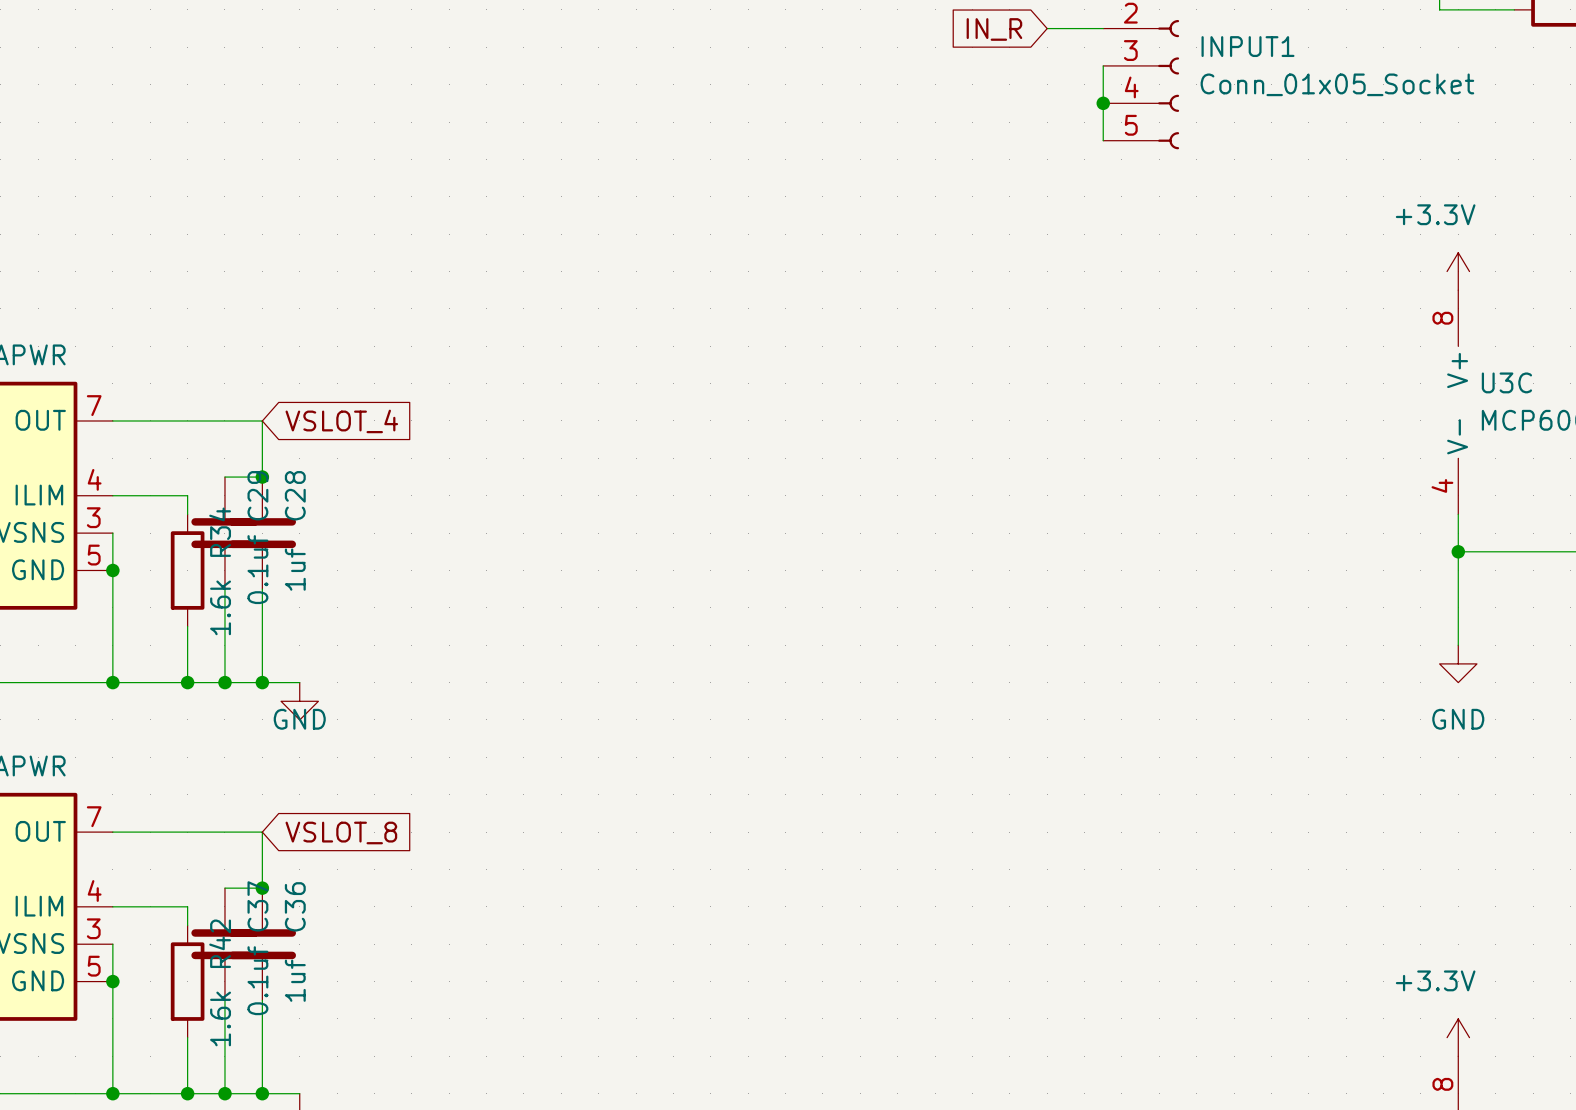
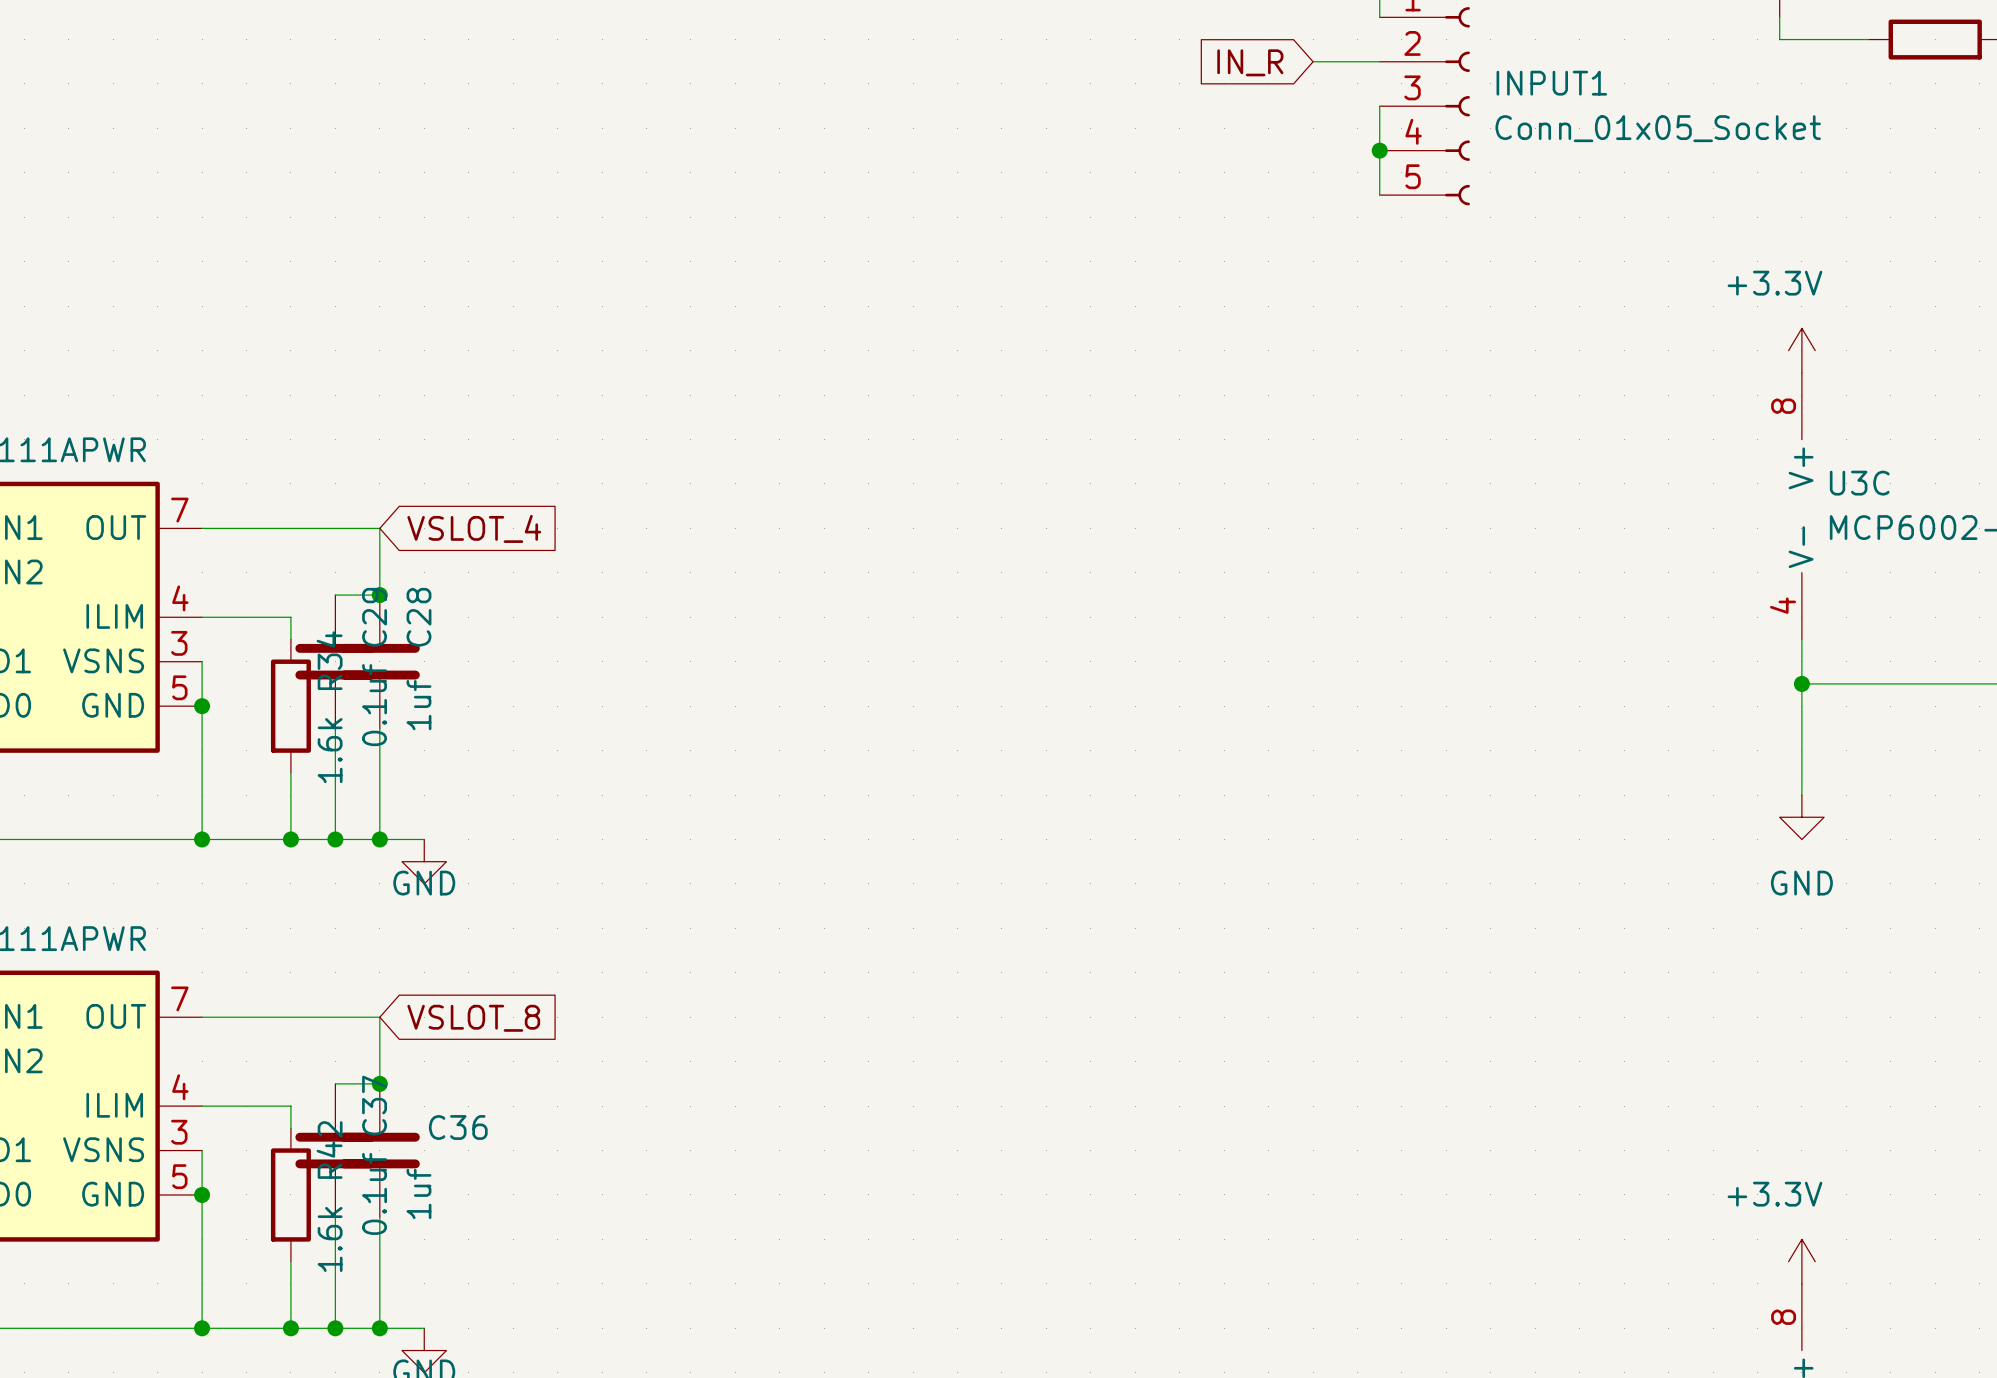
C36 name rotation: 0° (295, 906) -> 90° clockwise (458, 1127)

